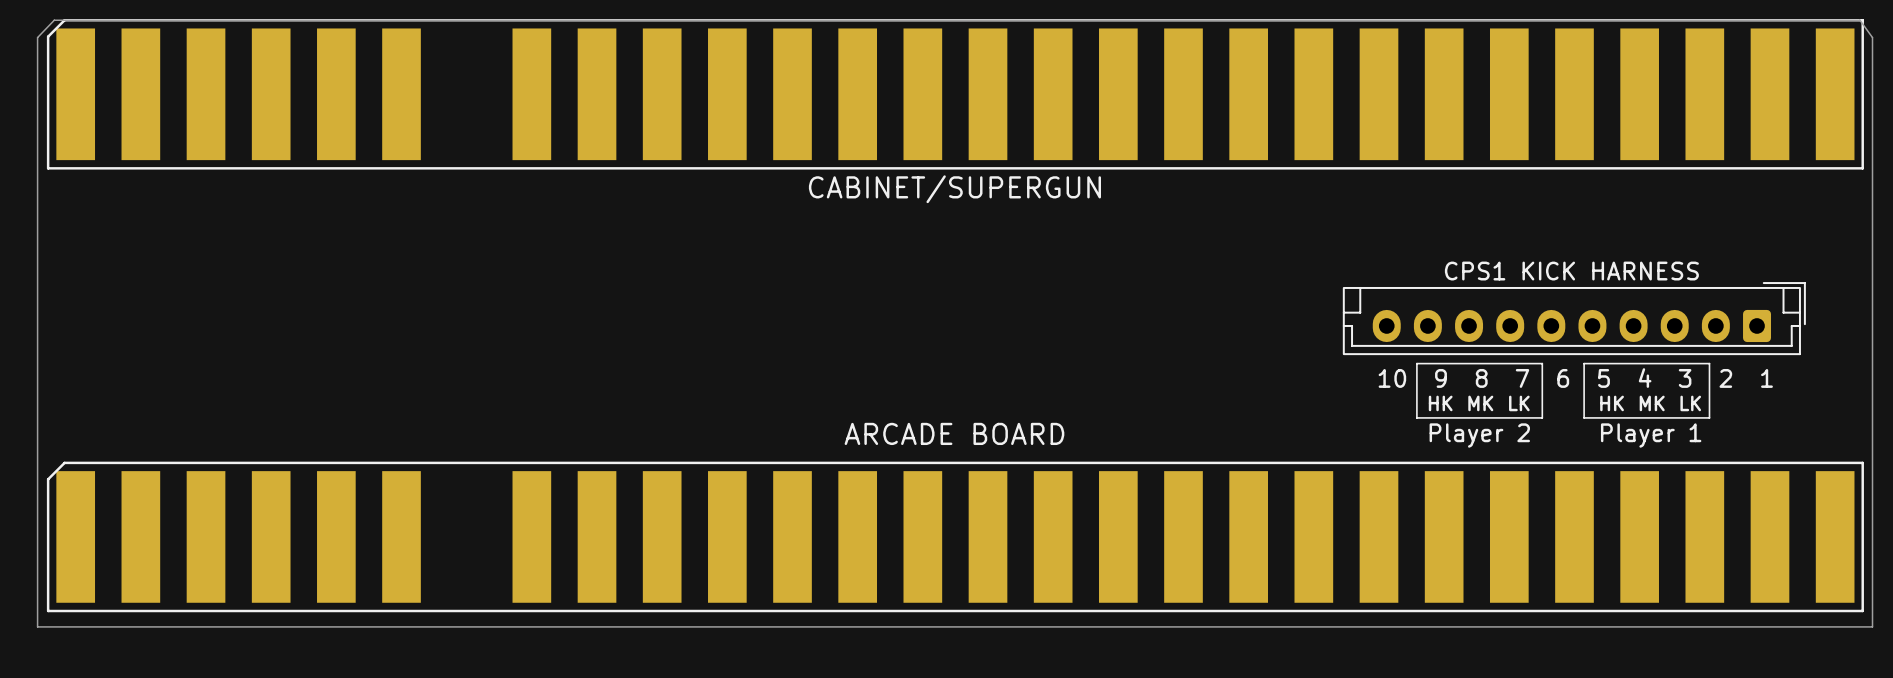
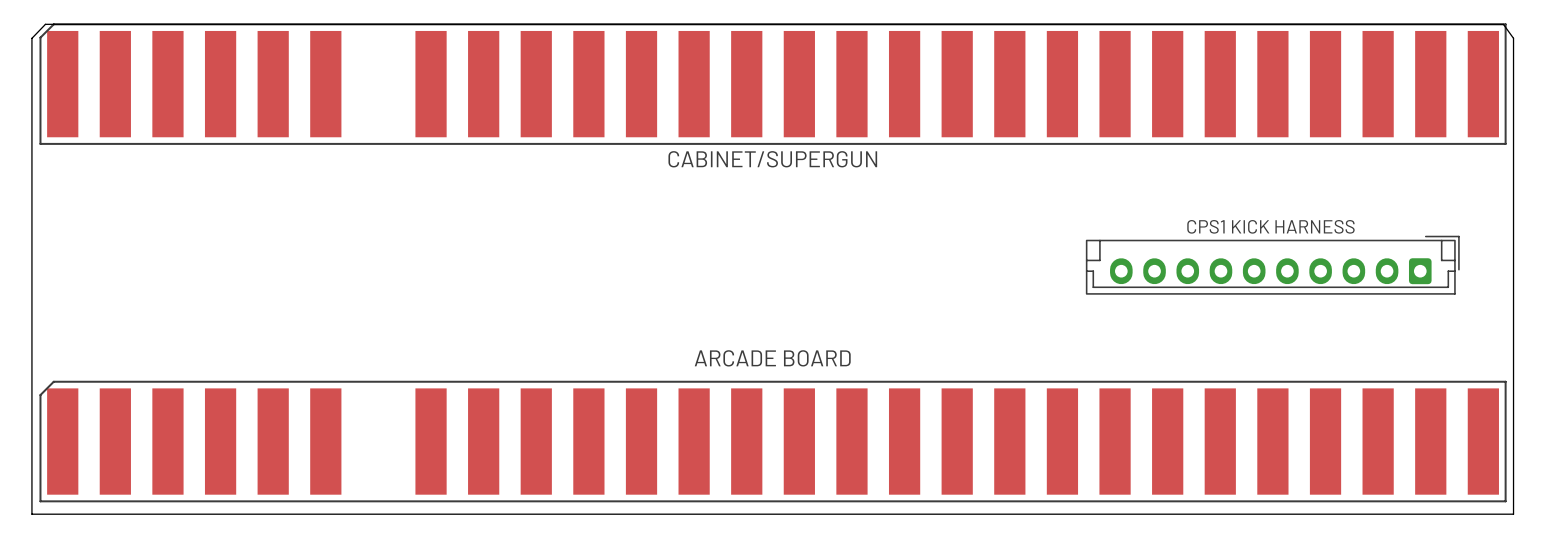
line: (1416, 363) (1542, 363) (1542, 417) (1416, 417) (1416, 363) -> none
line: (1584, 363) (1709, 363) (1709, 417) (1584, 417) (1584, 363) -> none
text: 10 9 8 7 6 5 4 3 2 1 (1575, 378) -> none
text: HK MK LK (1479, 403) -> none
text: HK MK LK (1650, 403) -> none
text: Player 2 (1479, 435) -> none
text: Player 1 (1651, 435) -> none

